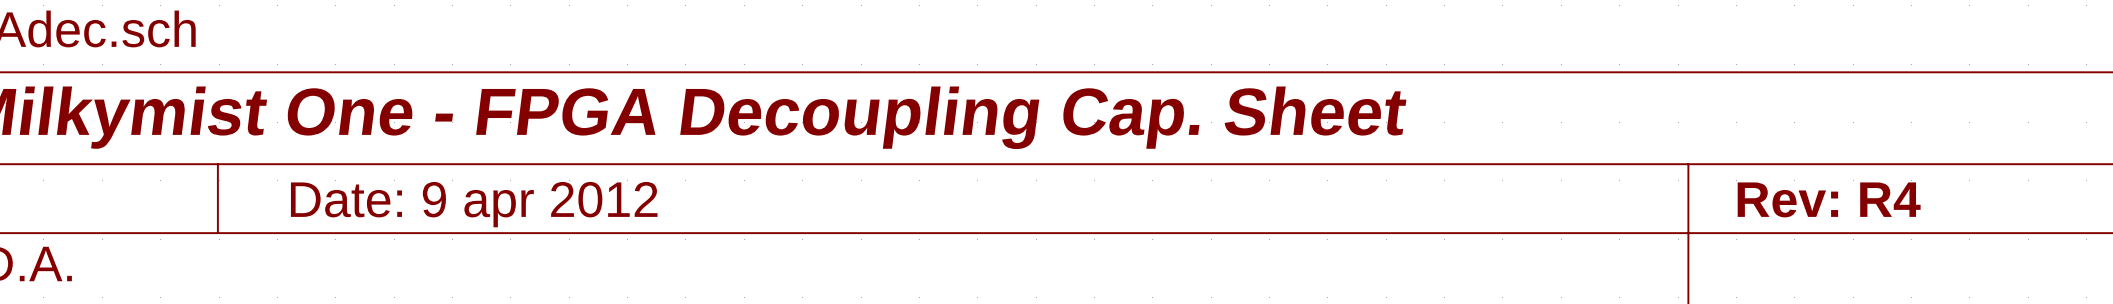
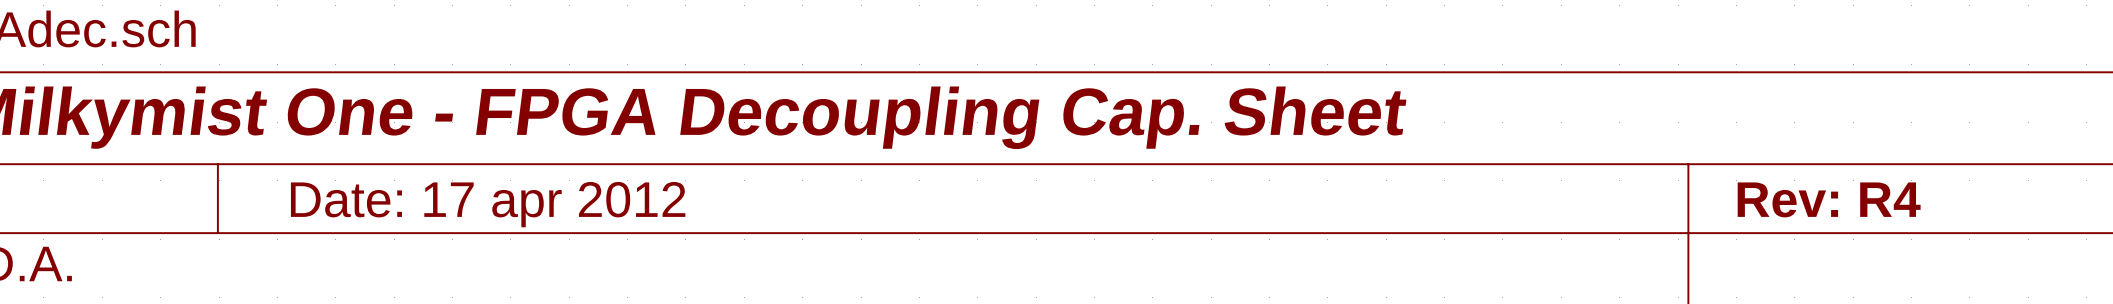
title block: Date: 9 apr 2012 (474, 204) -> Date: 17 apr 2012 (488, 204)

